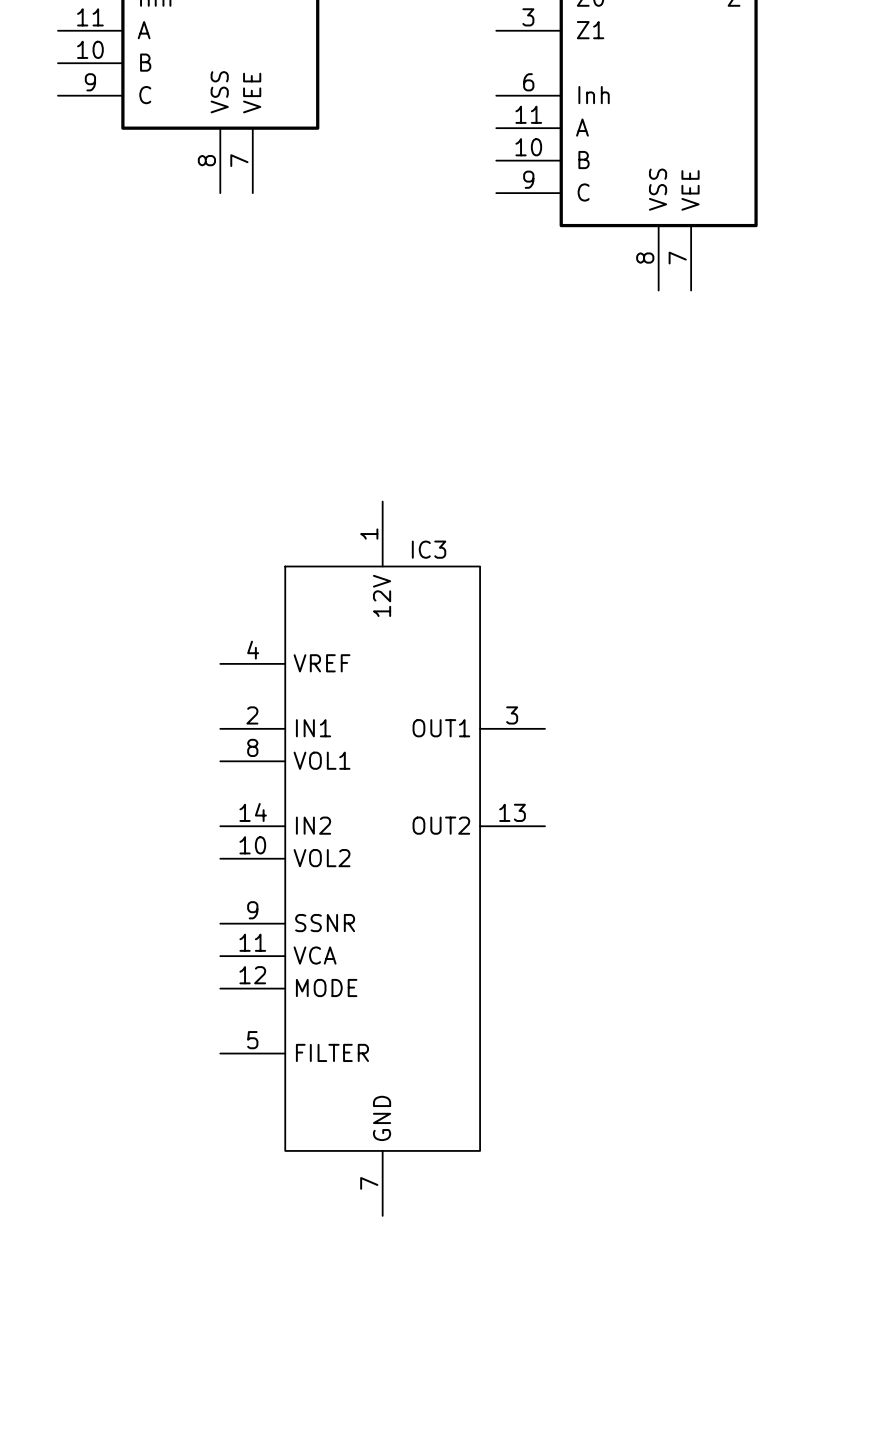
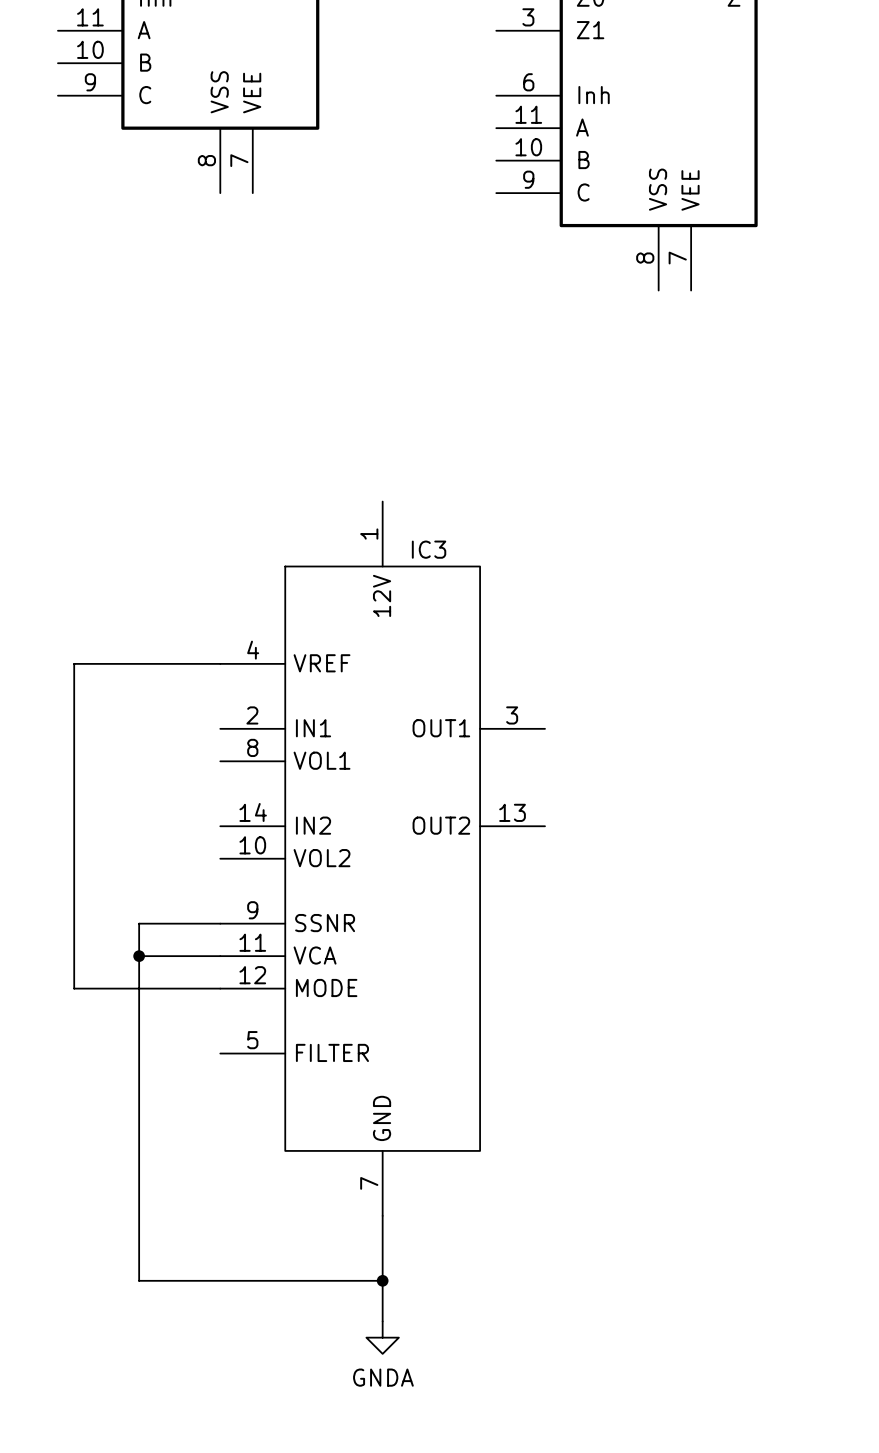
wire: none -> (220, 663) (74, 663) (74, 988) (220, 988)
wire: none -> (220, 923) (139, 923) (139, 1280) (382, 1280)
wire: none -> (139, 956) (220, 956)
junction: none -> (139, 956)
wire: none -> (382, 1215) (382, 1321)
junction: none -> (382, 1280)
power symbol: none -> GNDA (382, 1337)

